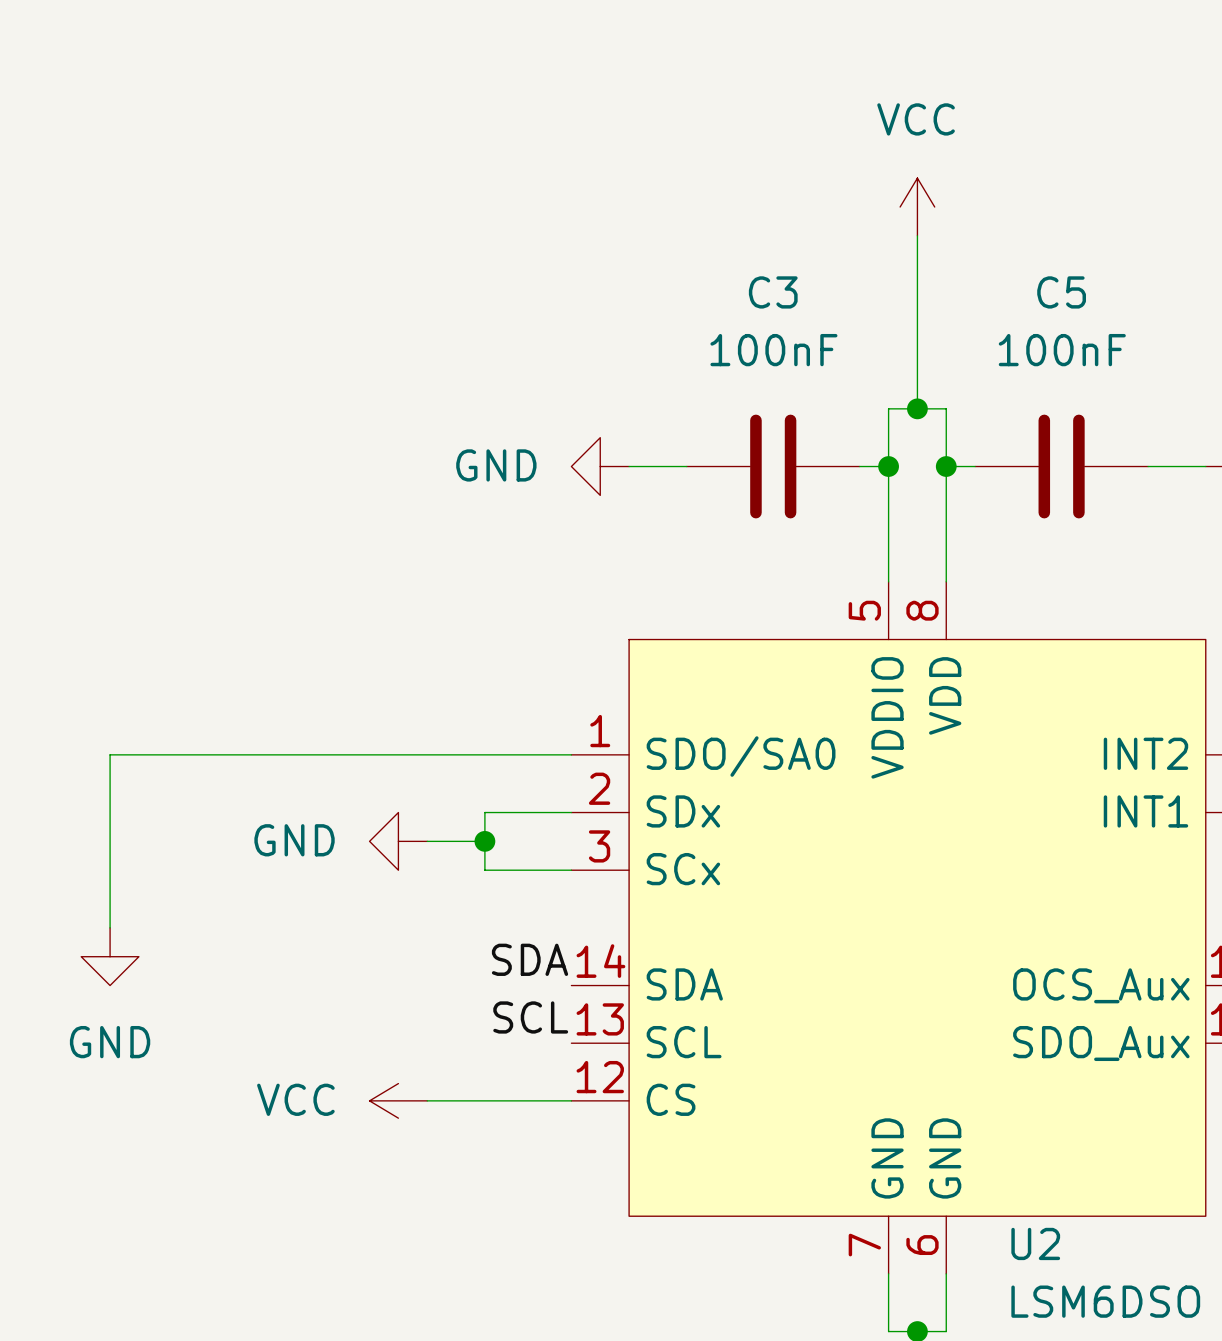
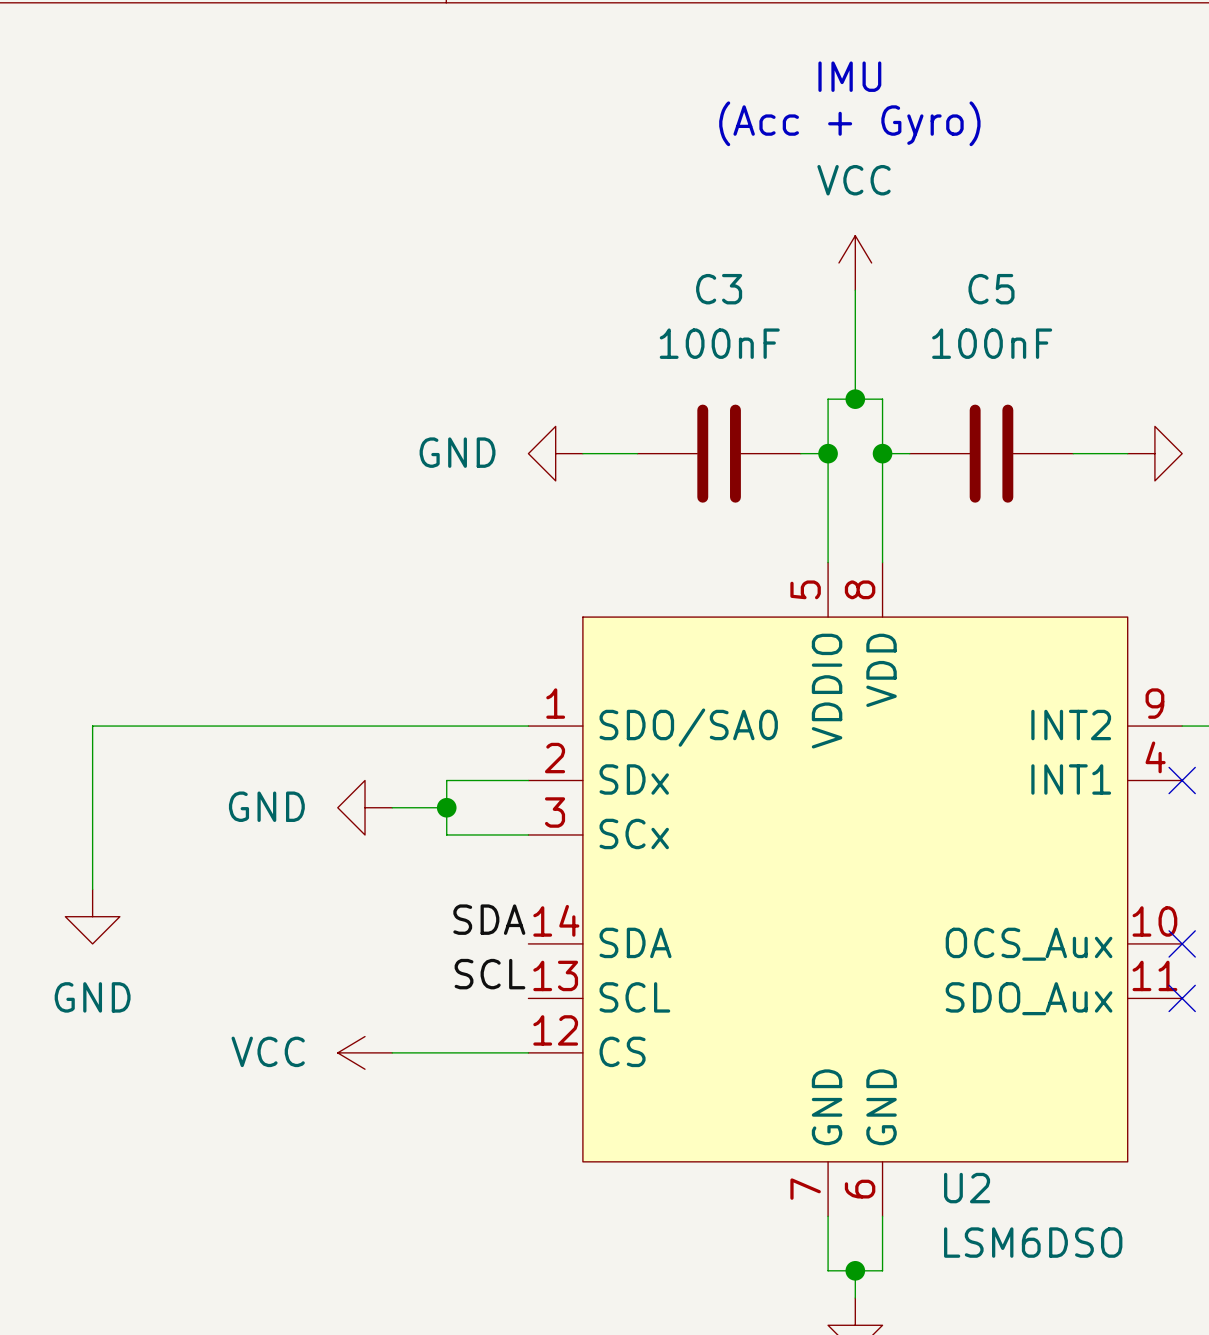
text: none -> IMU (849, 76)
text: none -> (Acc + Gyro) (849, 123)
power symbol position: VCC (917, 207) -> VCC (855, 262)

